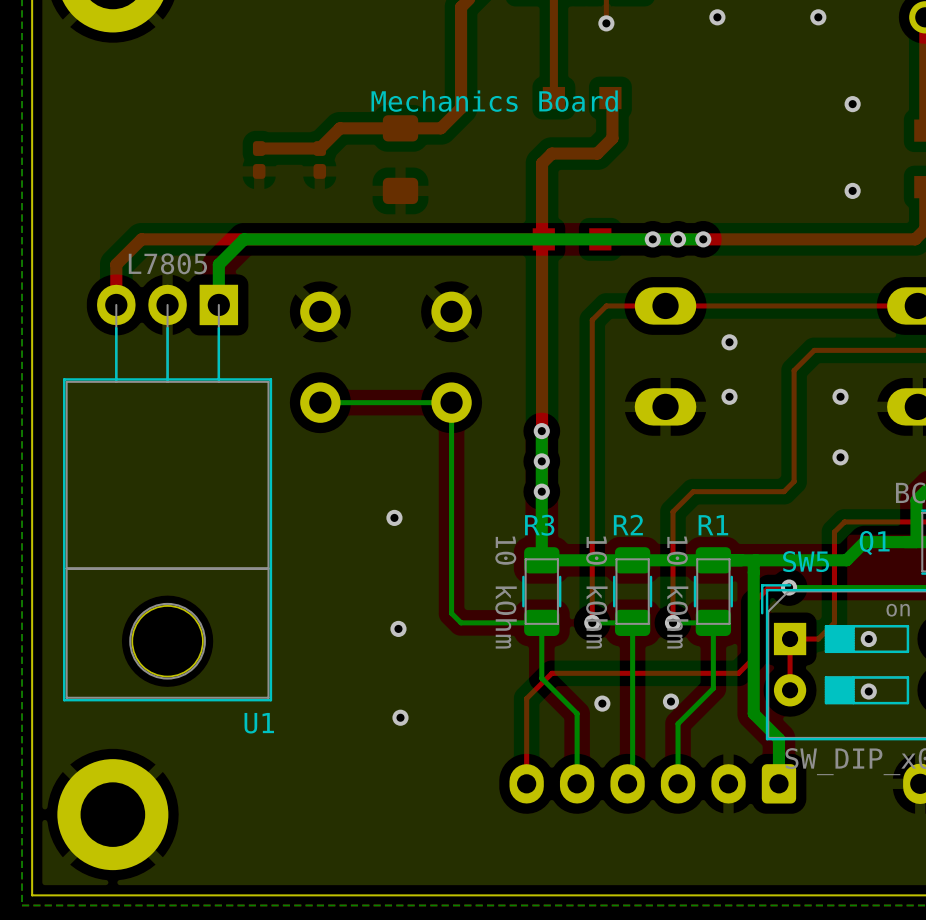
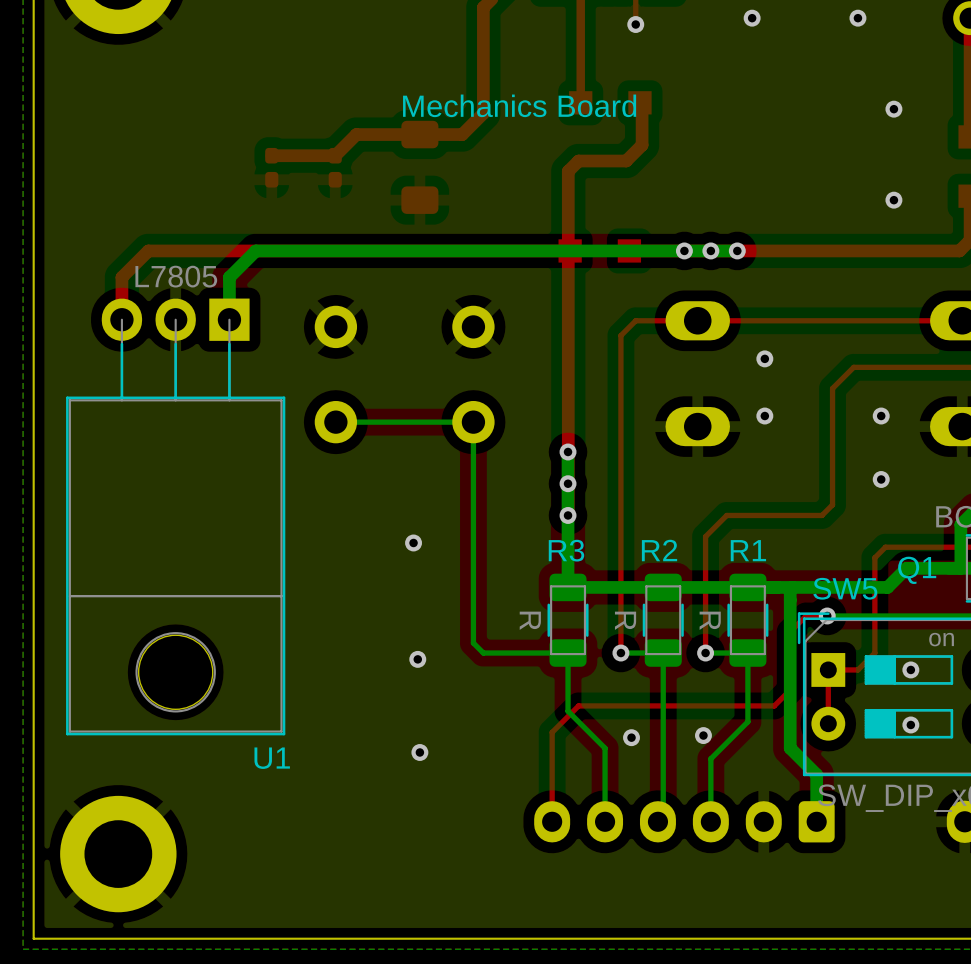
R3 value: 10 kOhm (506, 592) -> R (530, 620)
R2 value: 10 kOhm (596, 592) -> R (625, 620)
R1 value: 10 kOhm (677, 592) -> R (710, 620)

